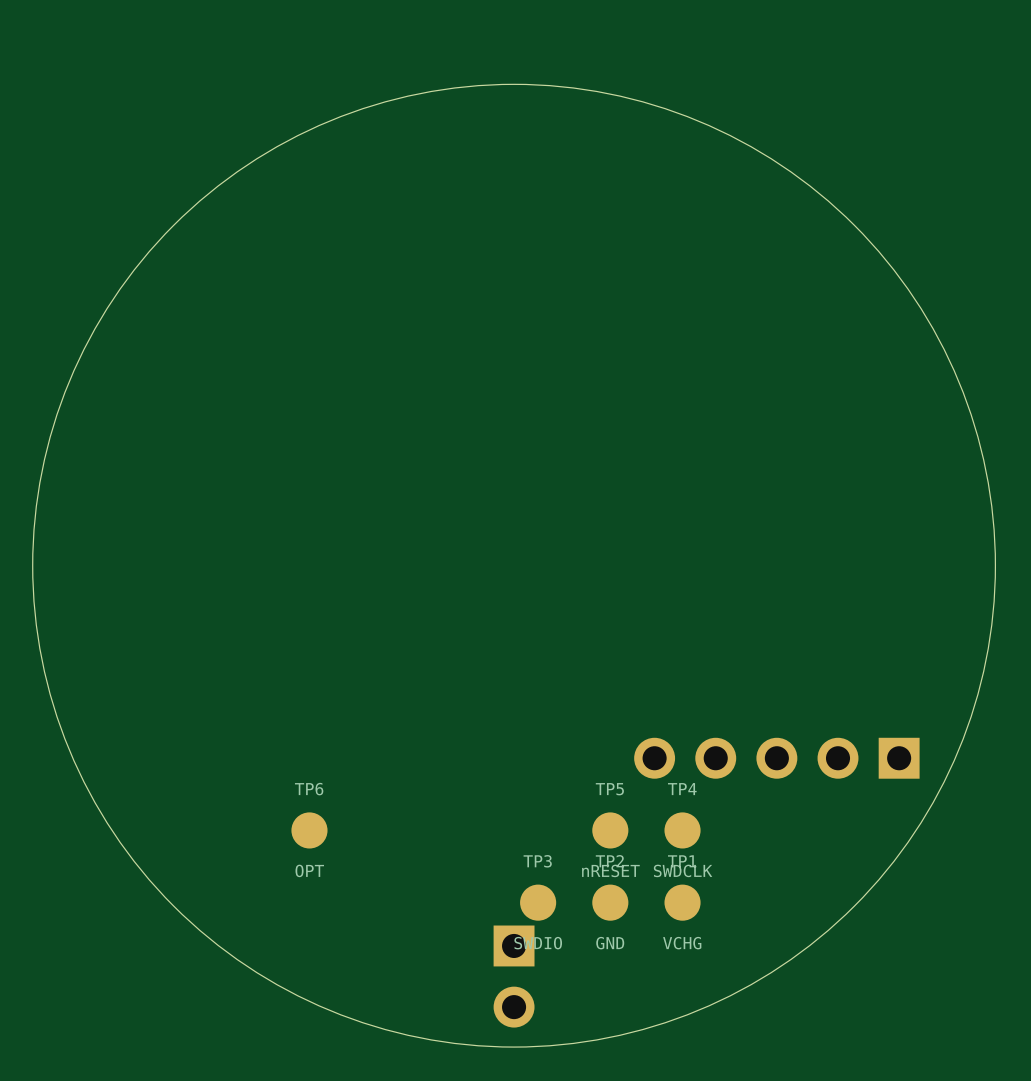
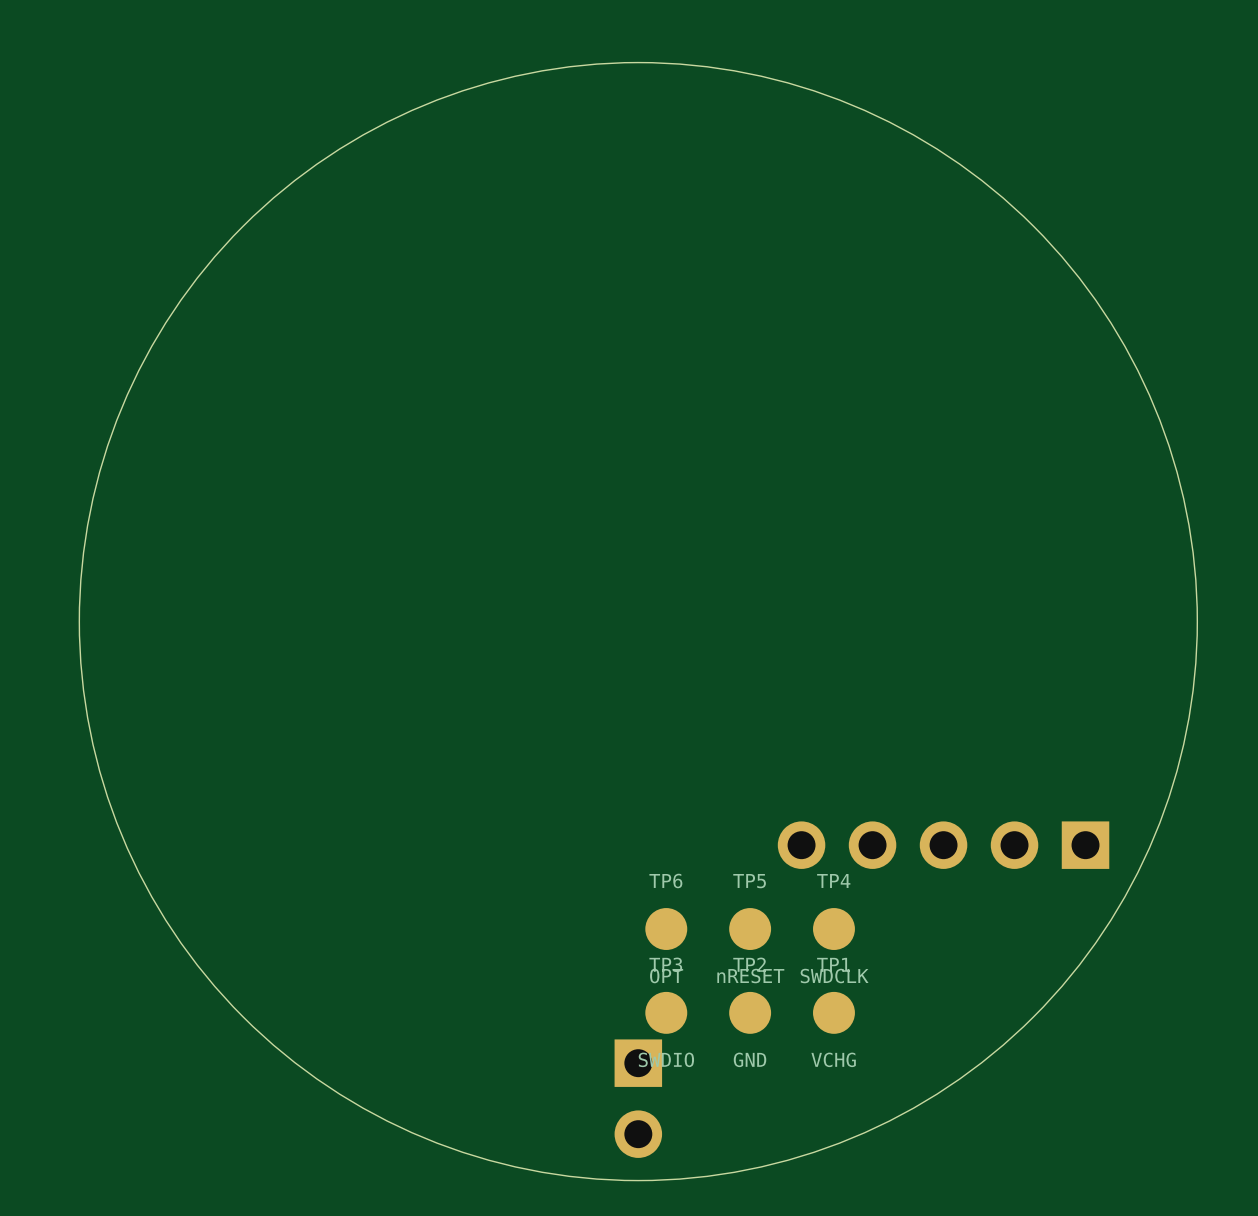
TP6 position: (309, 830) -> (666, 929)

